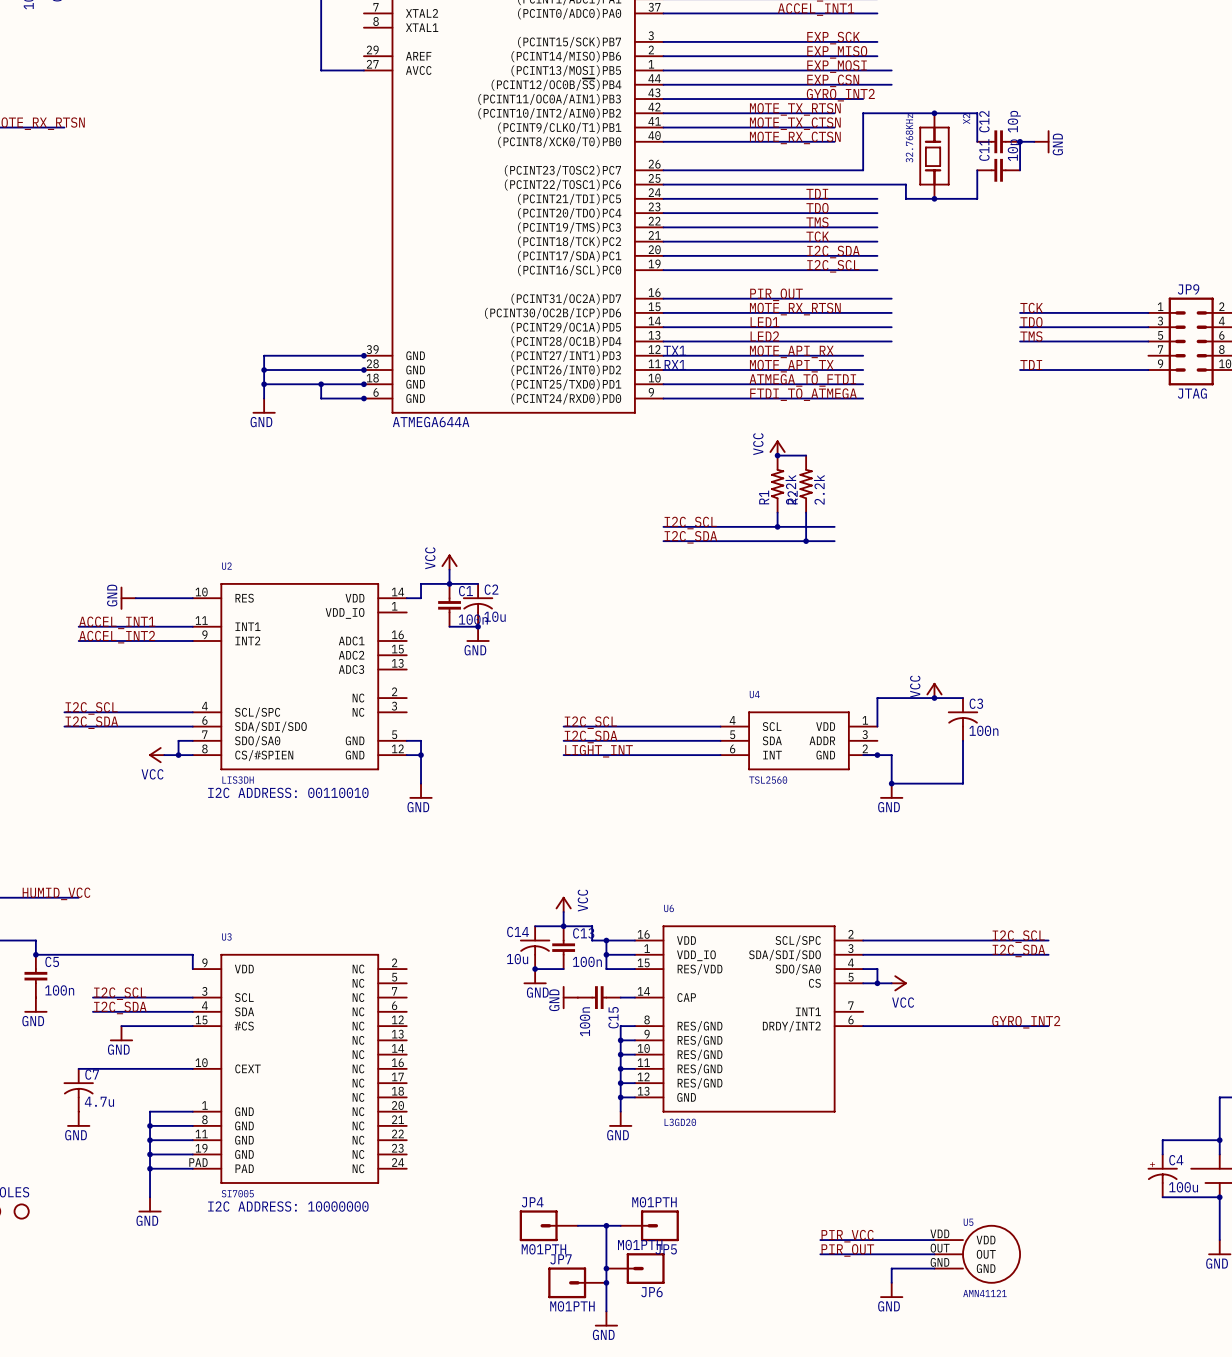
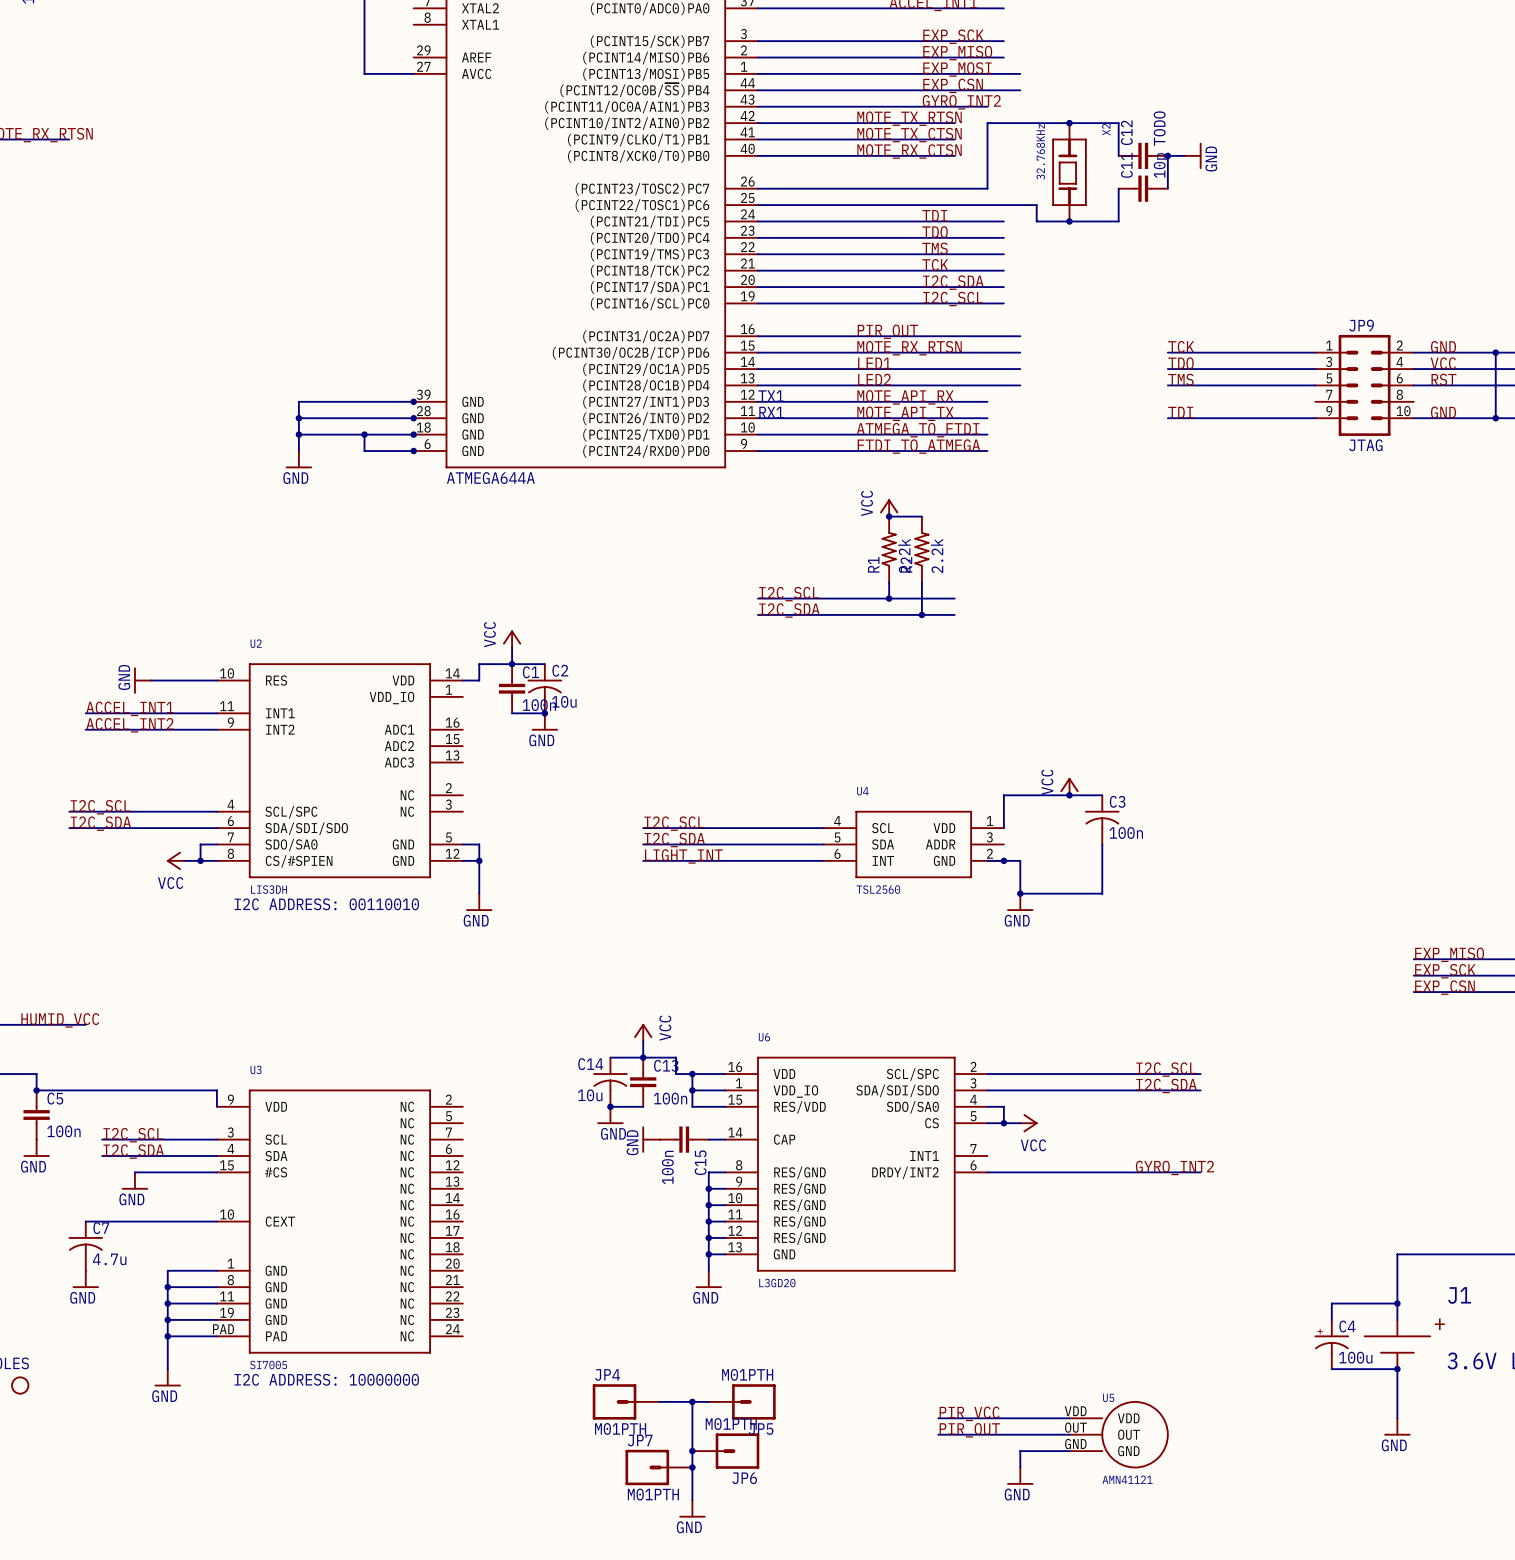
C12 value: 10p (1014, 121) -> TODO (1159, 128)

